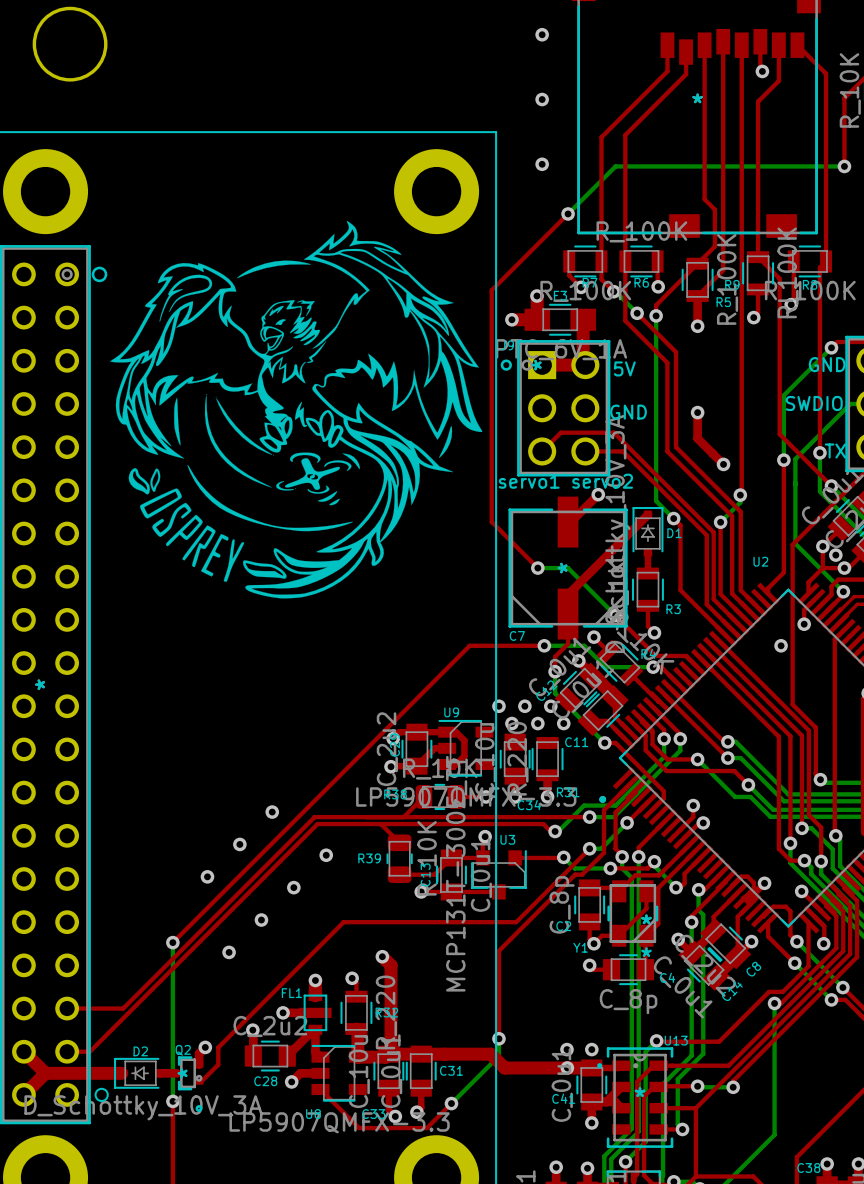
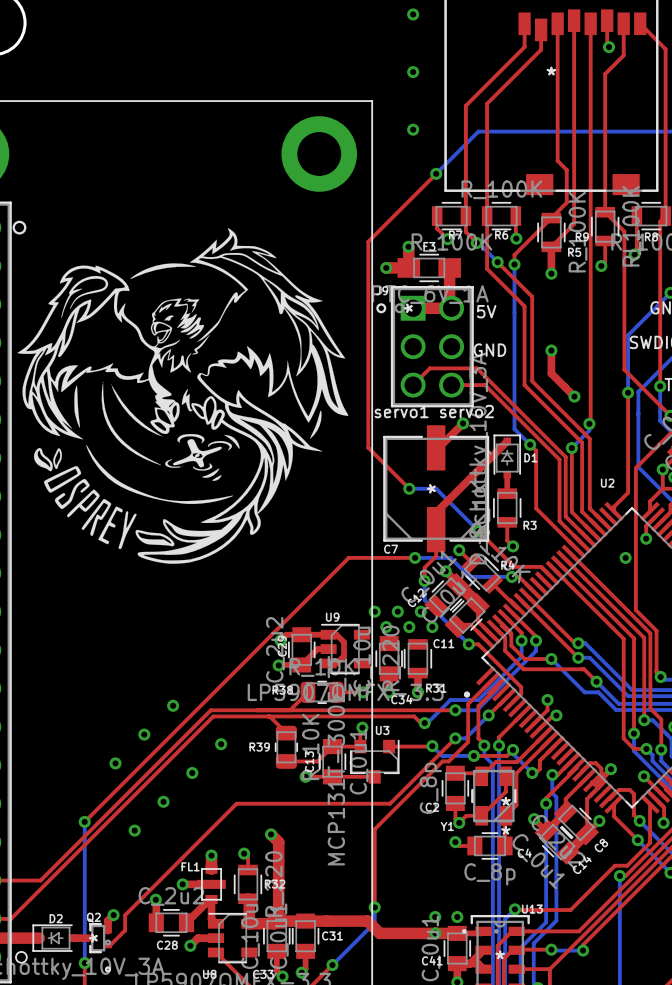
drawing position: (296, 409) -> (182, 395)

